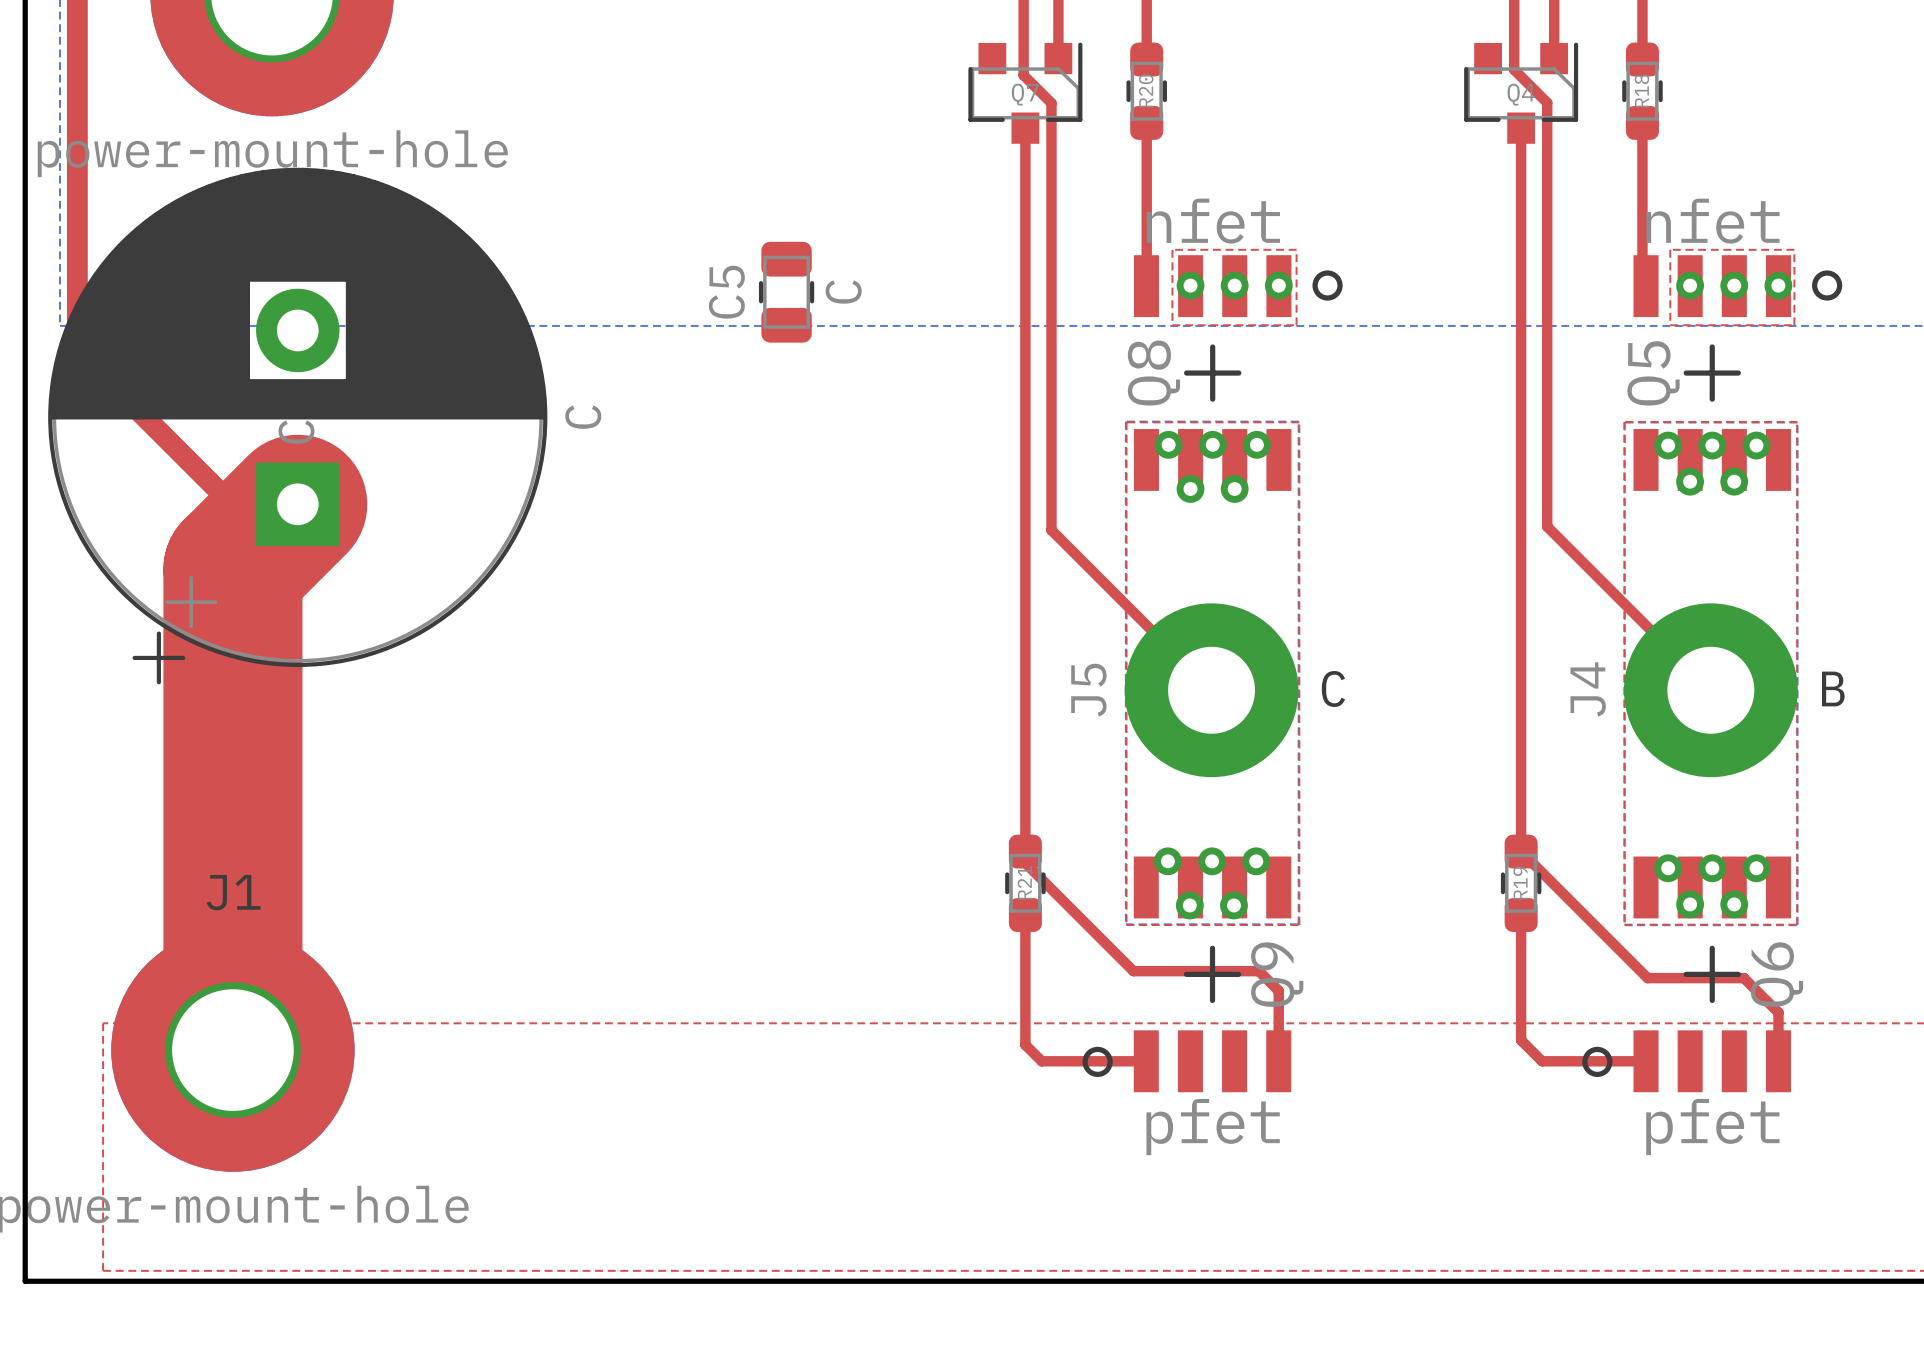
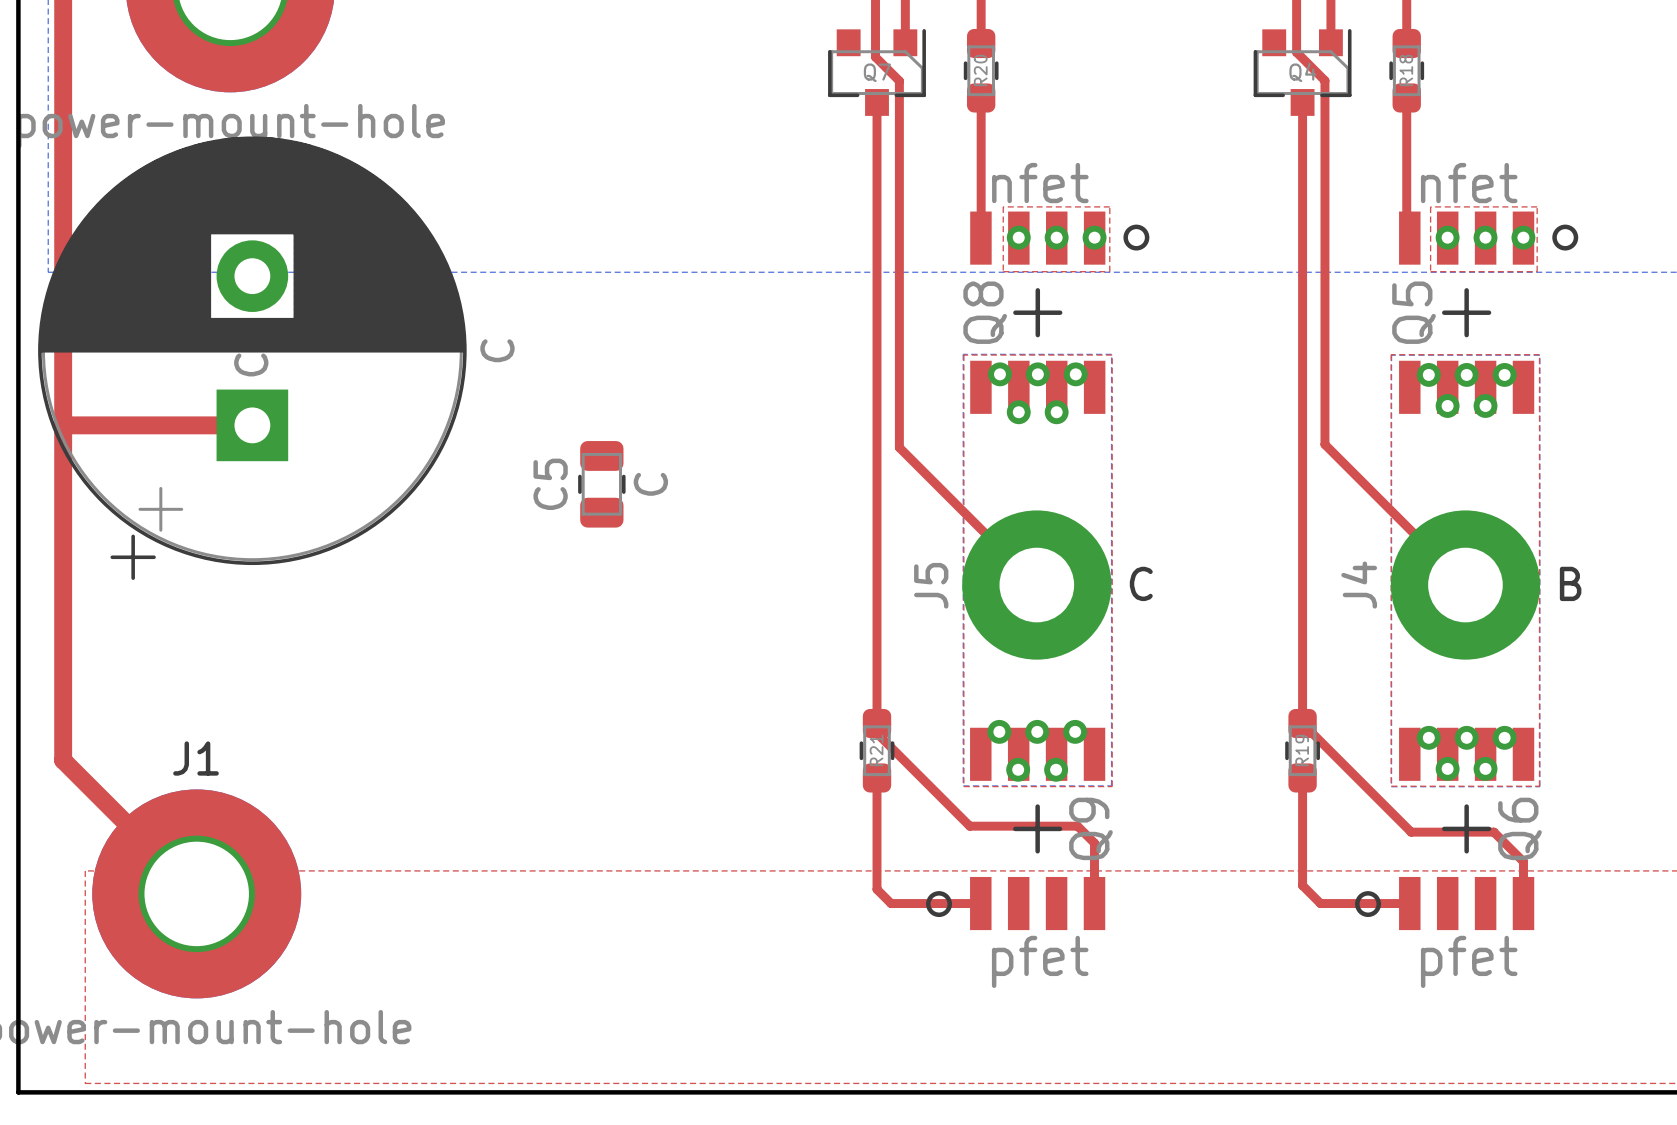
C5 position: (786, 292) -> (601, 484)
top track: (77, 349) (232, 504) -> (63, 427) (64, 425) (195, 425)
top track: (297, 504) (232, 569) (232, 1050) -> (63, 292) (63, 760) (196, 893)

